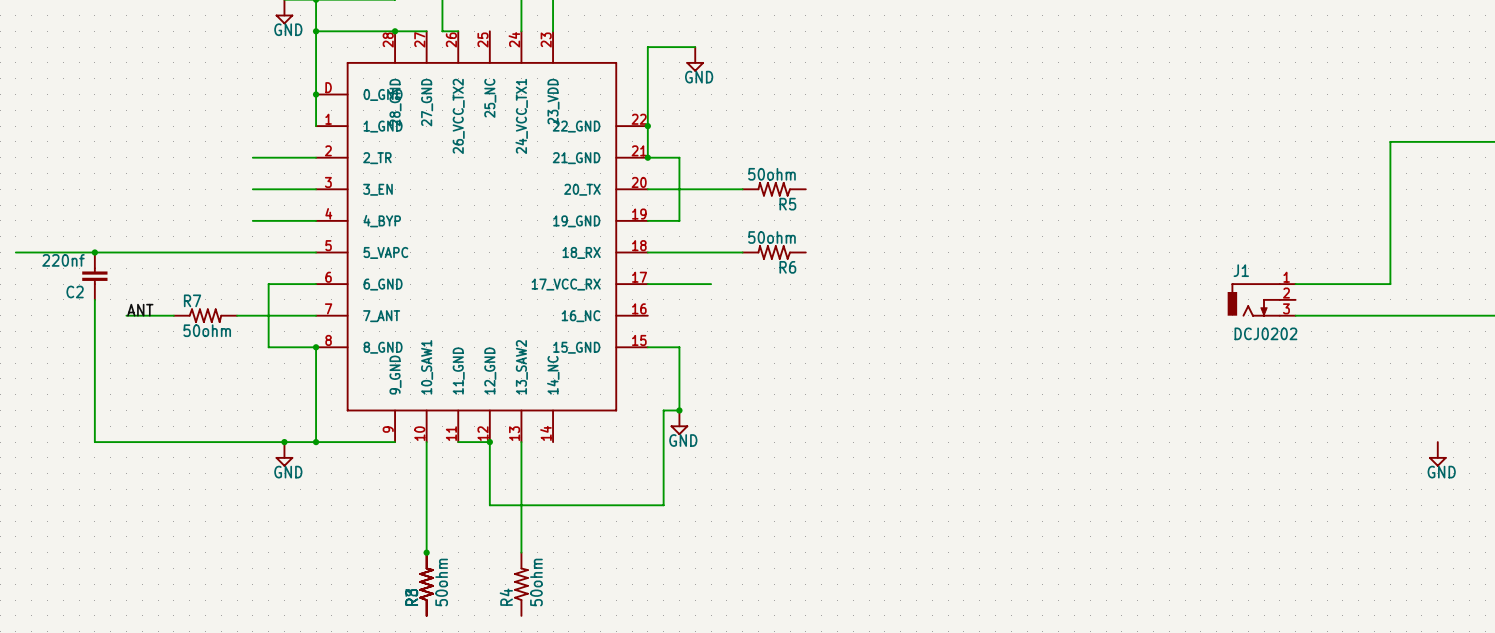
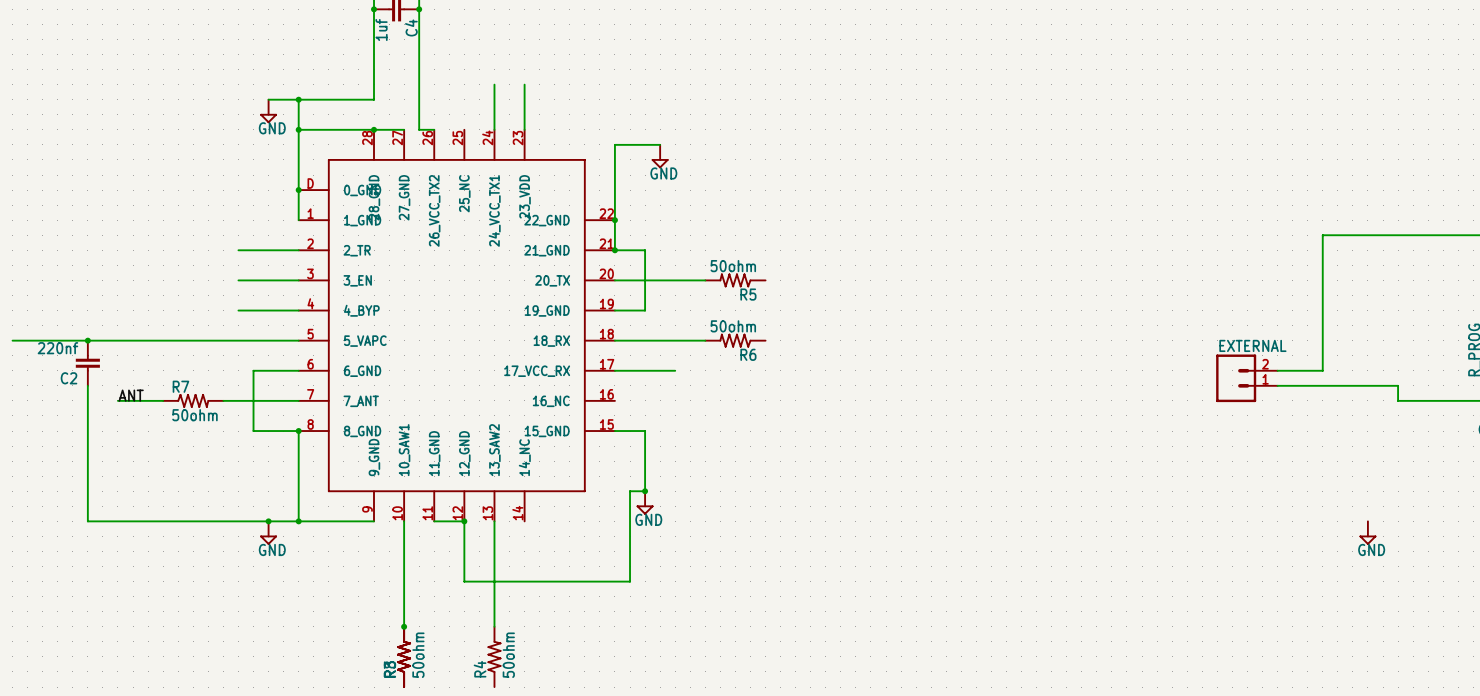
EXTERNAL: none -> (1246, 378)
J1: DCJ0202 (1261, 299) -> none
wire: (1295, 315) (1469, 315) -> (1277, 385) (1398, 385) (1398, 400)

